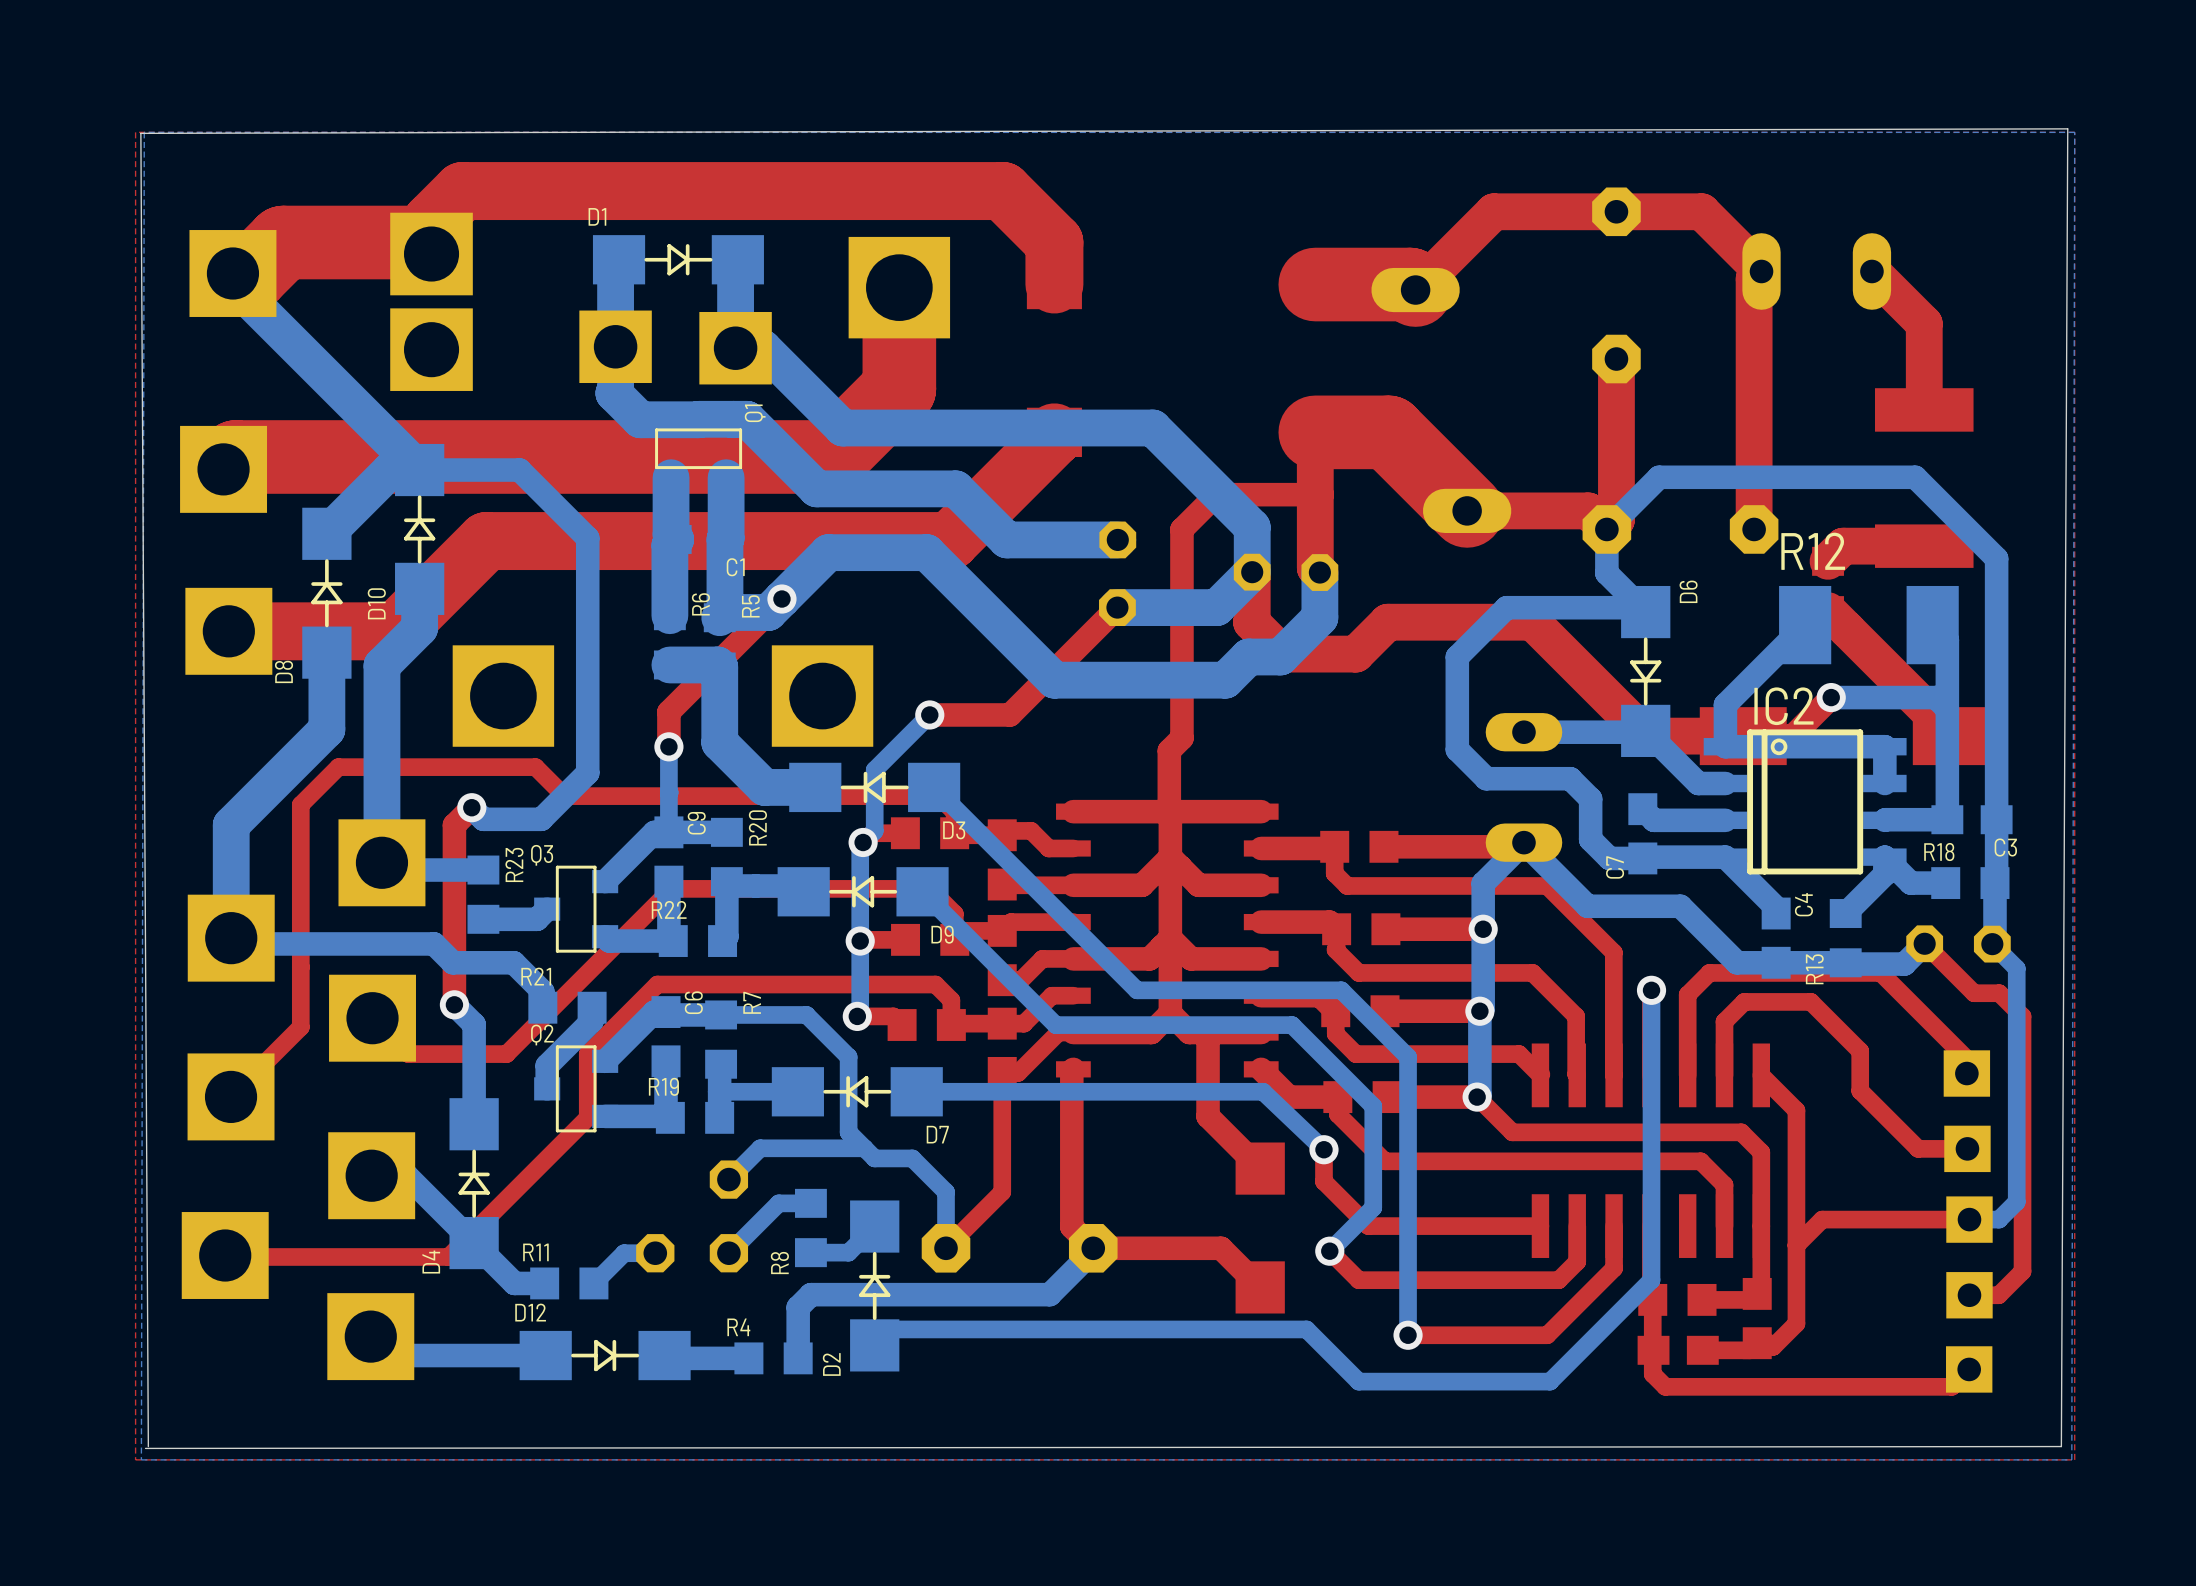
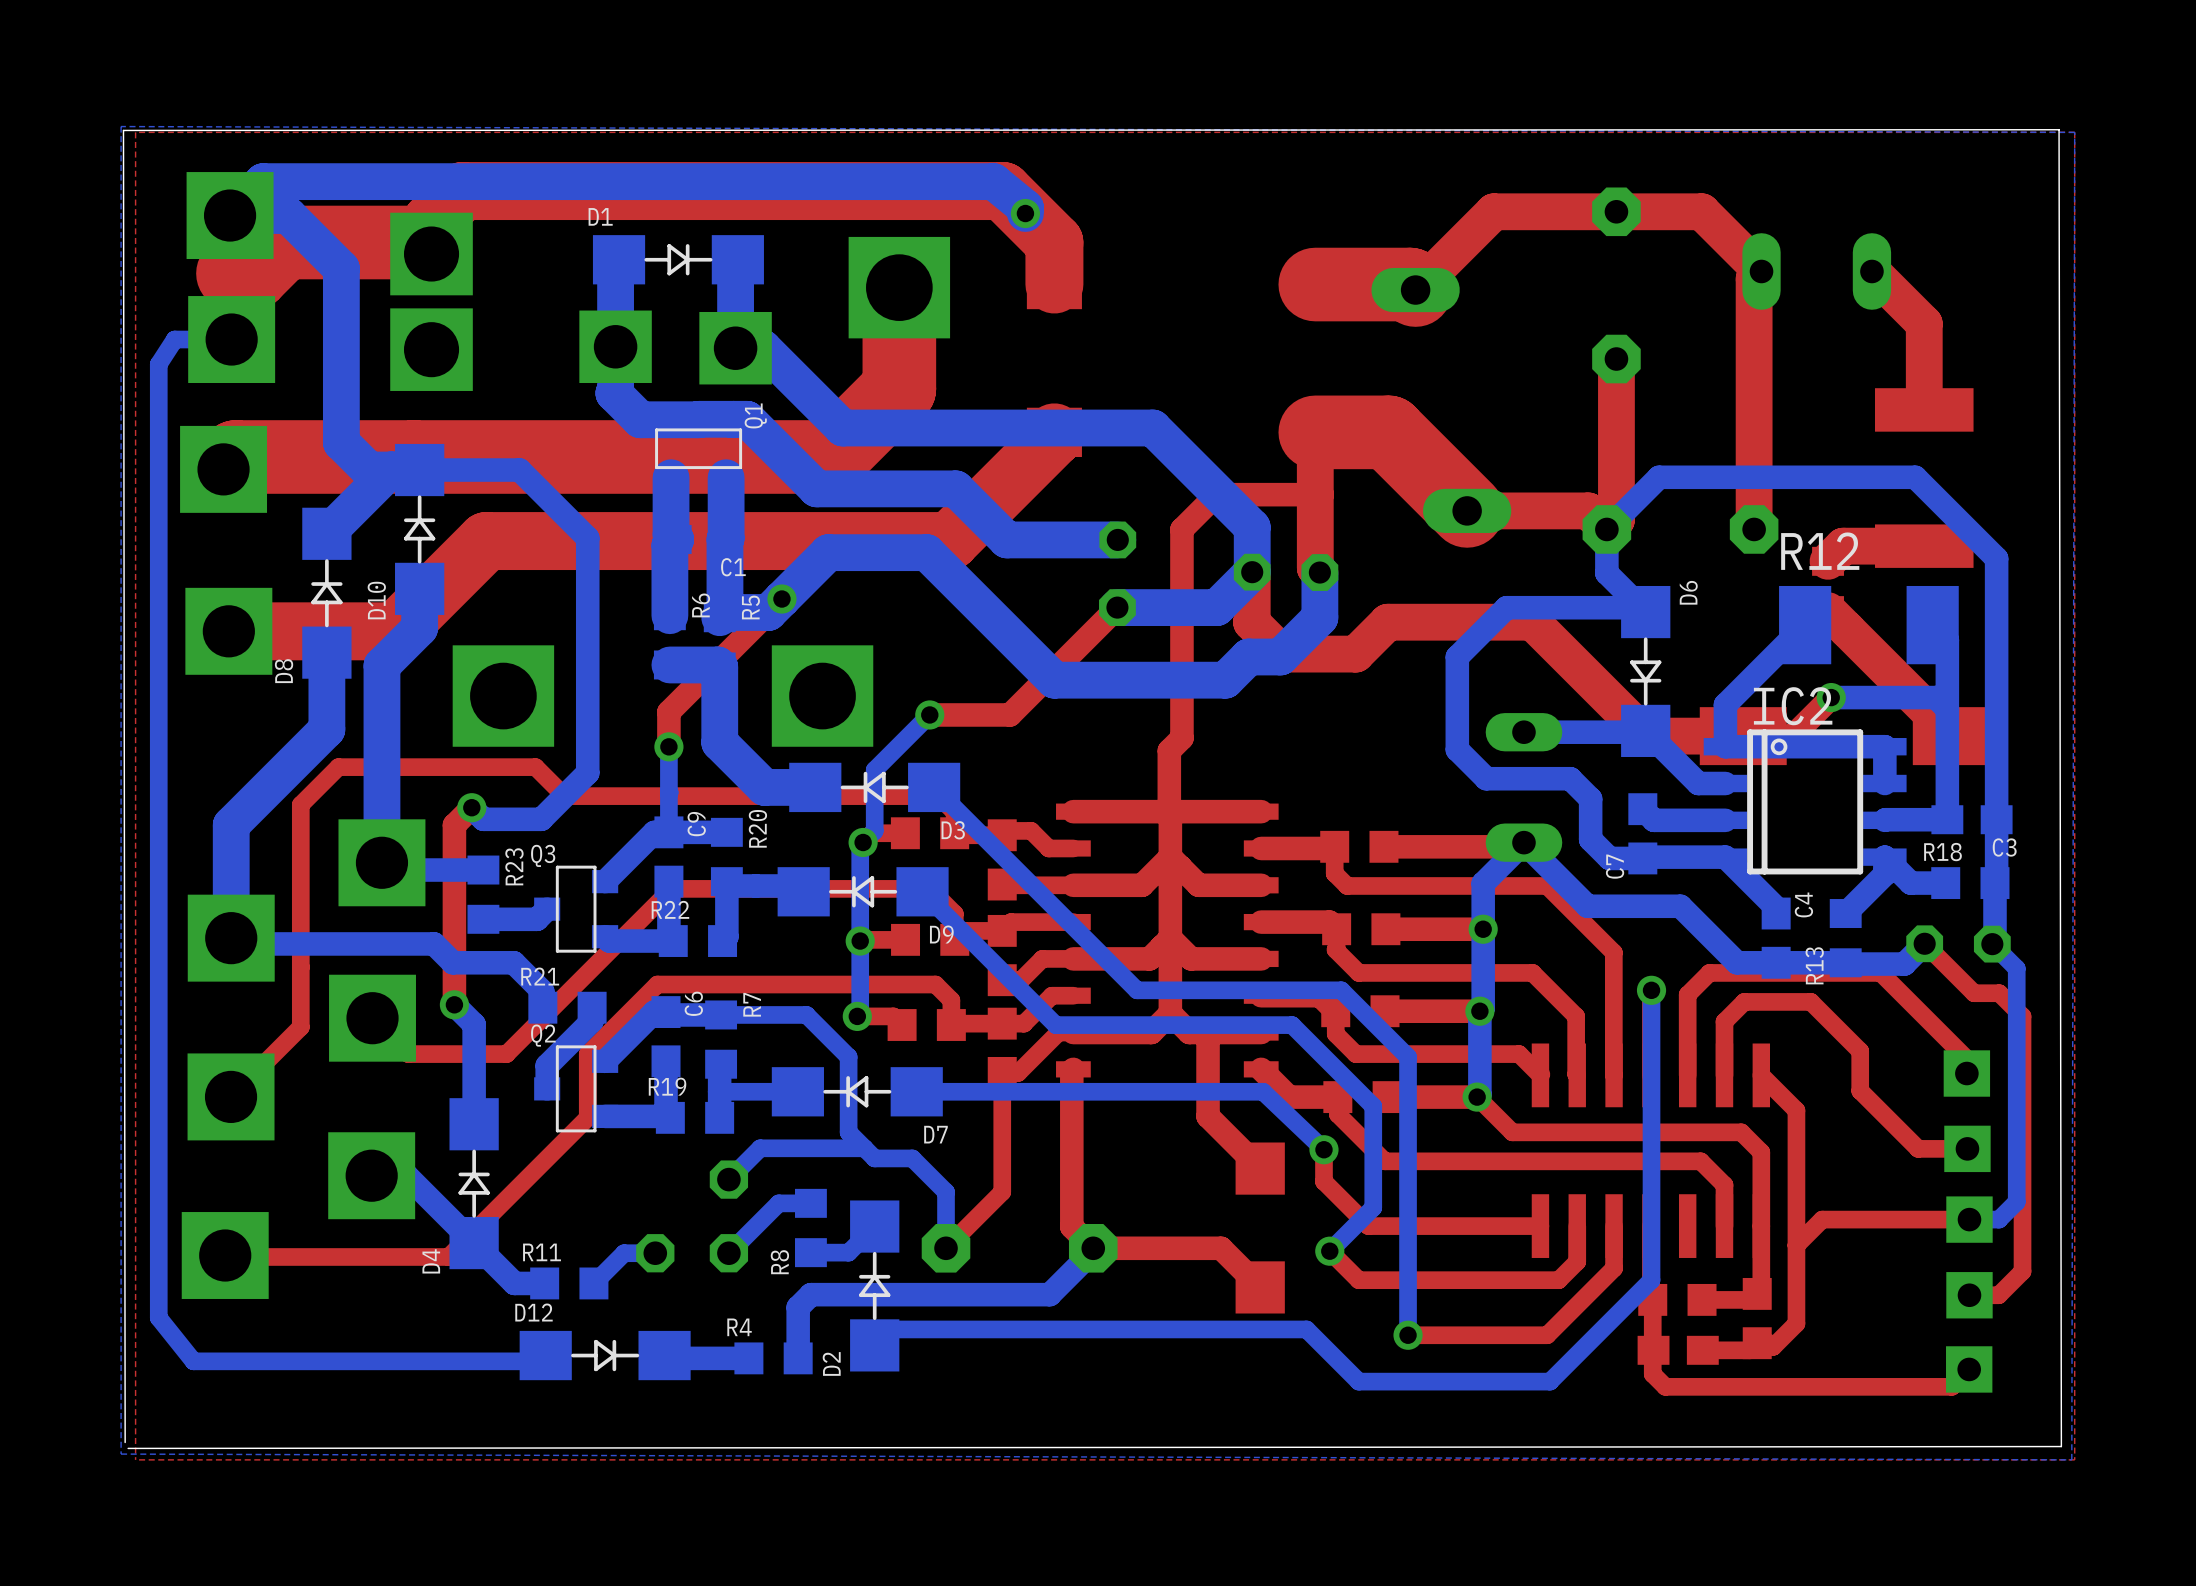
bottom zone outline: (2074, 132) (144, 132) (141, 1459) (2071, 1459) -> (2074, 132) (121, 126) (121, 1454) (2071, 1459)
bottom track: none -> (1025, 213) (1025, 207) (993, 181) (263, 181) (228, 216)
via: none -> (1025, 213)
bottom track: none -> (230, 215) (288, 215) (341, 268) (341, 442) (368, 470) (390, 470)
part: none -> (230, 215)
bottom track: (232, 273) (232, 283) (419, 470) -> none
part: (232, 273) -> none
part: none -> (231, 339)
bottom track: (370, 1336) (389, 1355) (545, 1355) -> (231, 339) (174, 339) (158, 364) (158, 1317) (193, 1361) (539, 1361) (545, 1355)
part: (370, 1336) -> none
board edge: (2061, 1446) (2067, 128) (140, 133) (148, 1446) -> (2061, 1446) (2059, 129) (123, 130) (125, 1442)

